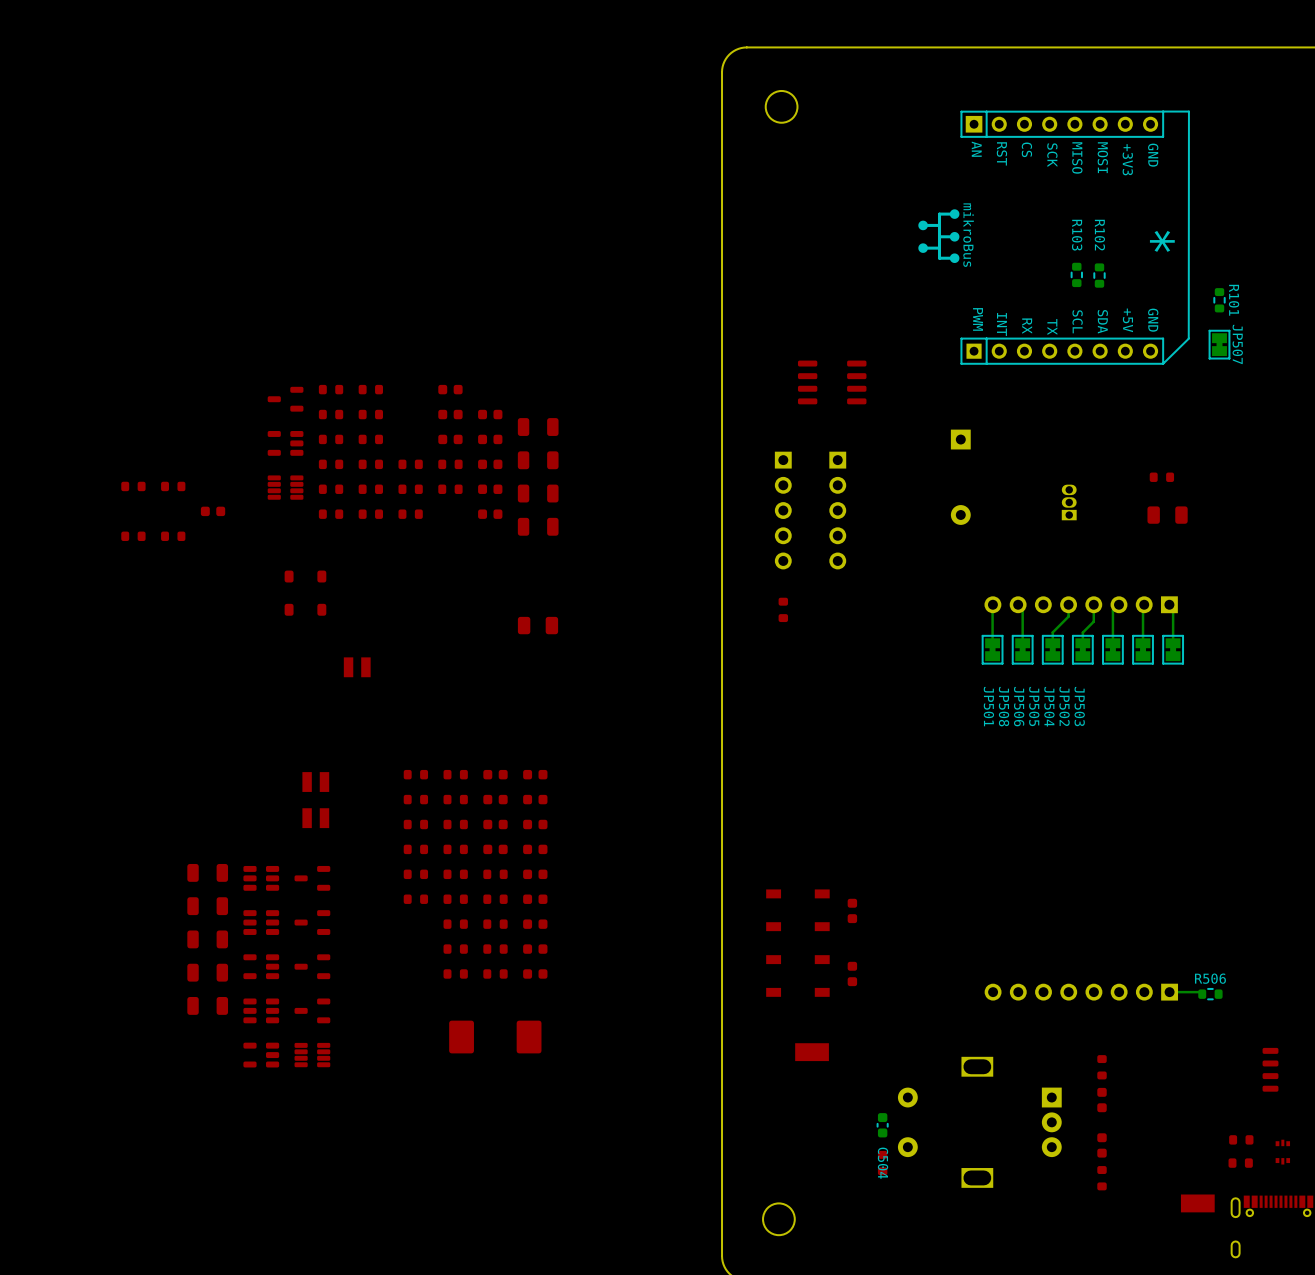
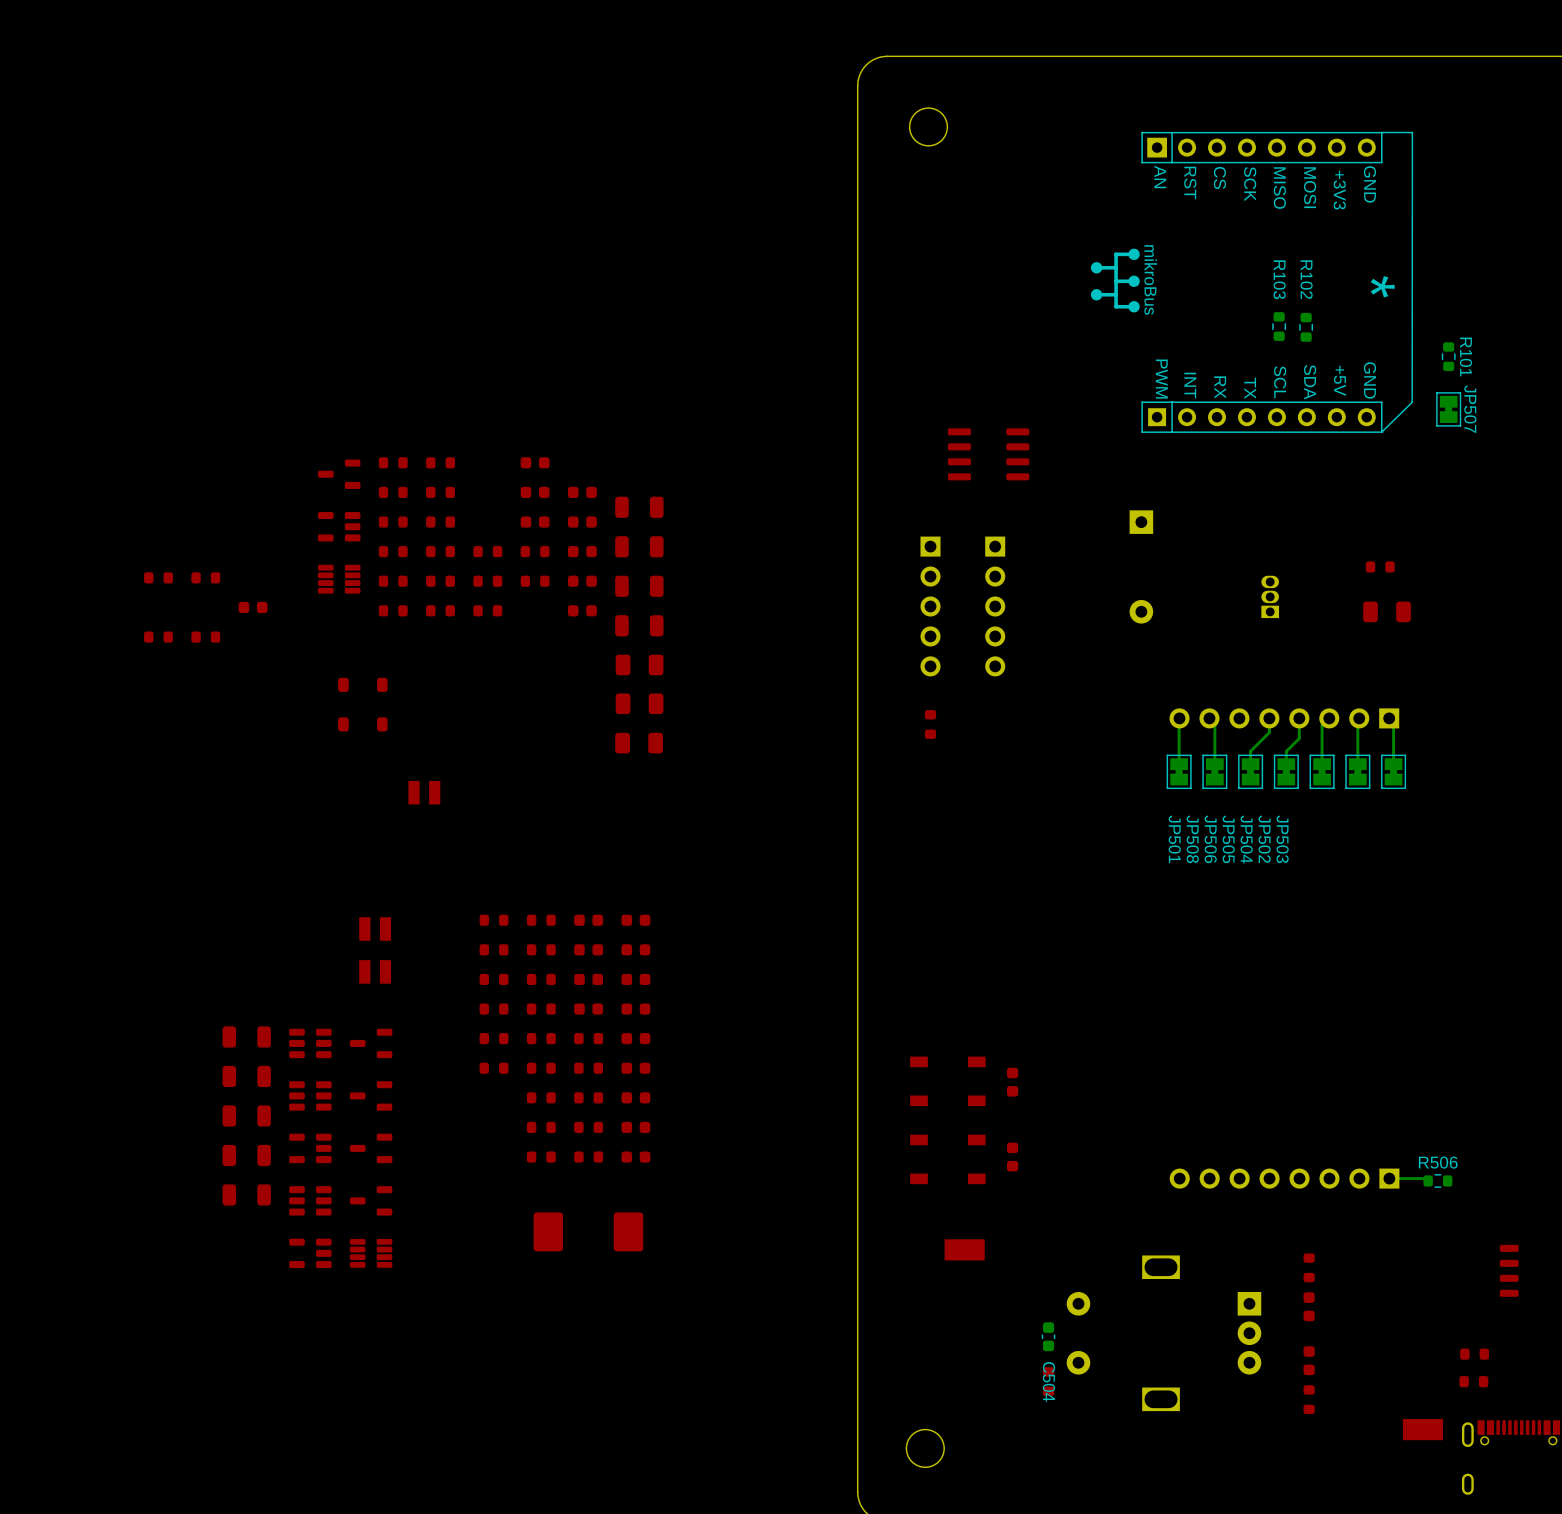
part: none -> (639, 664)
part: none -> (639, 703)
part: (1282, 1152) -> none

